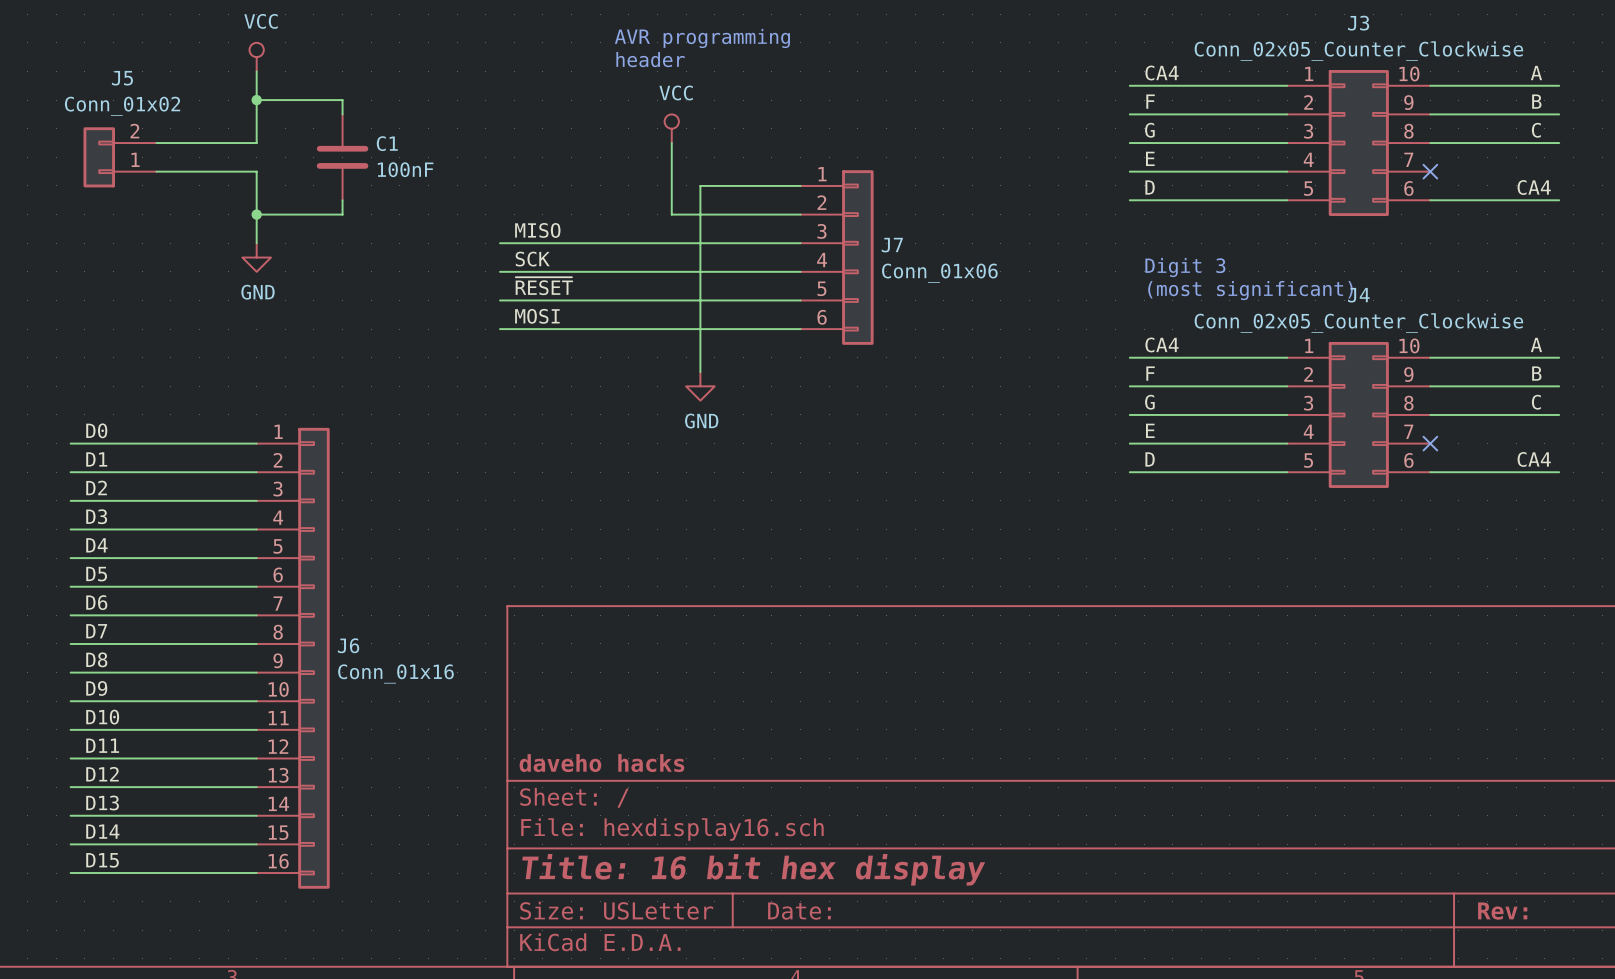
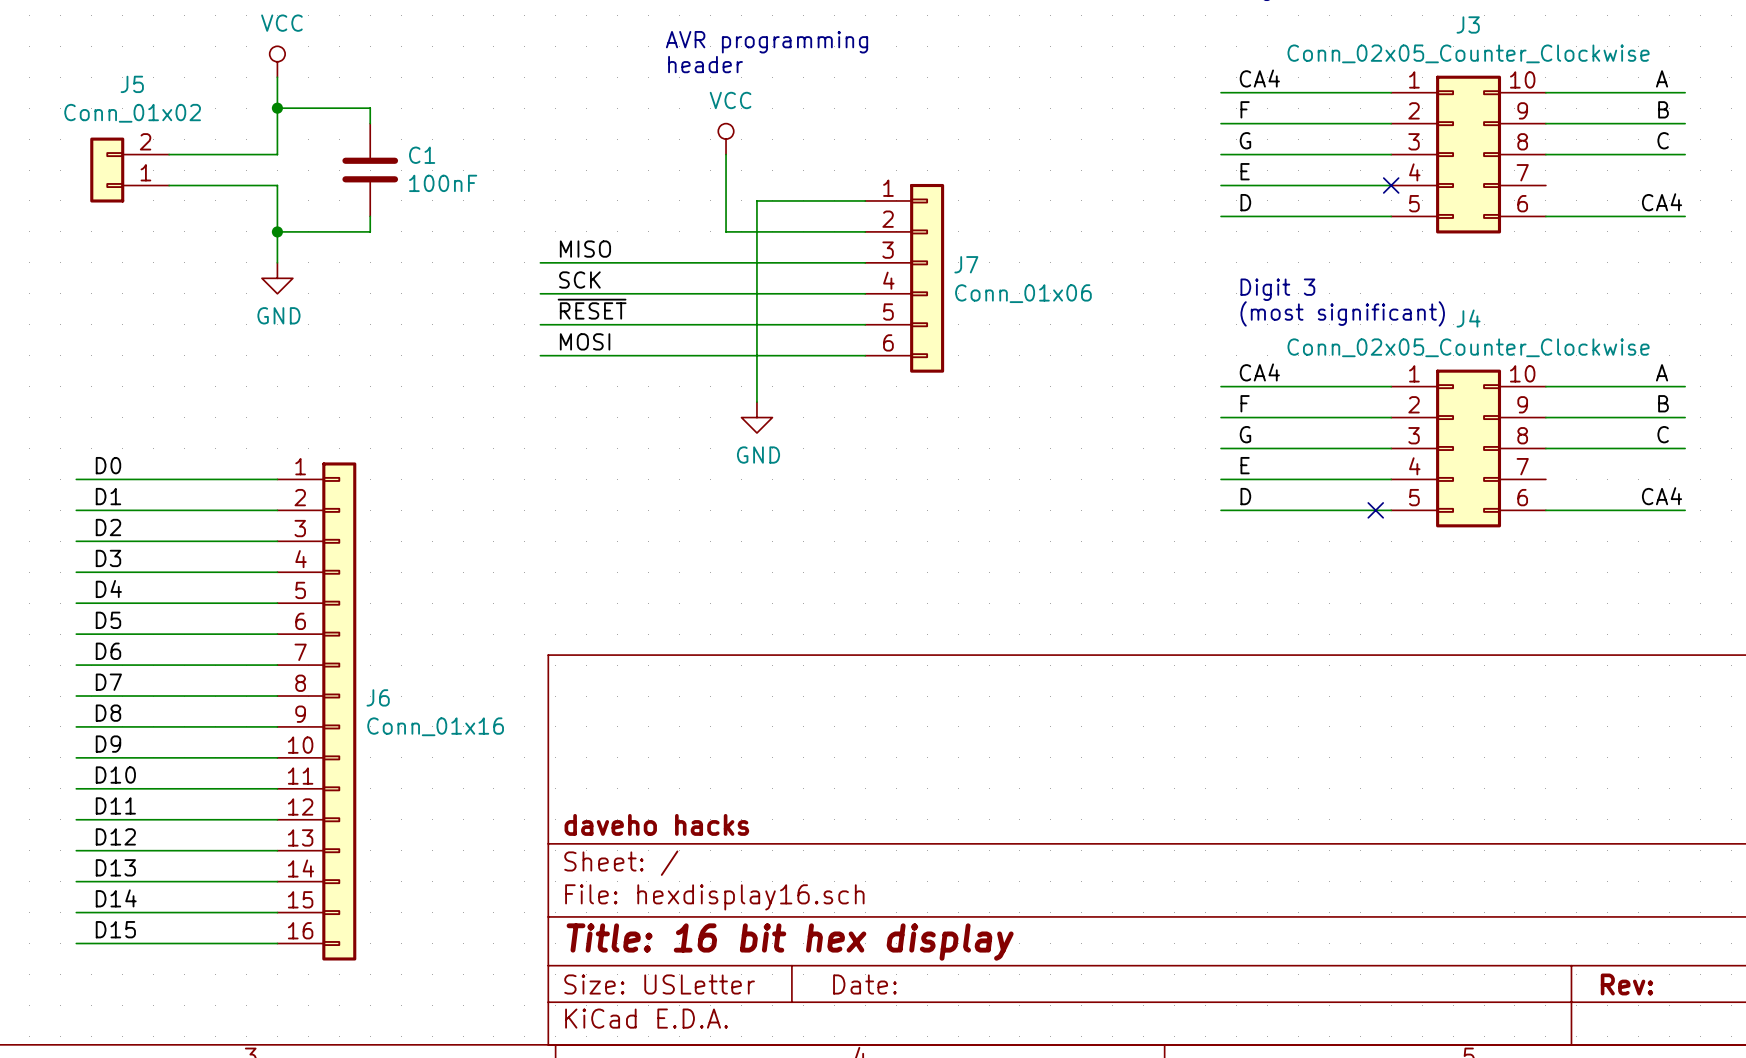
no-connect mark: none -> (1391, 185)
no-connect mark: (1430, 171) -> none
no-connect mark: (1430, 443) -> none
no-connect mark: none -> (1375, 510)

